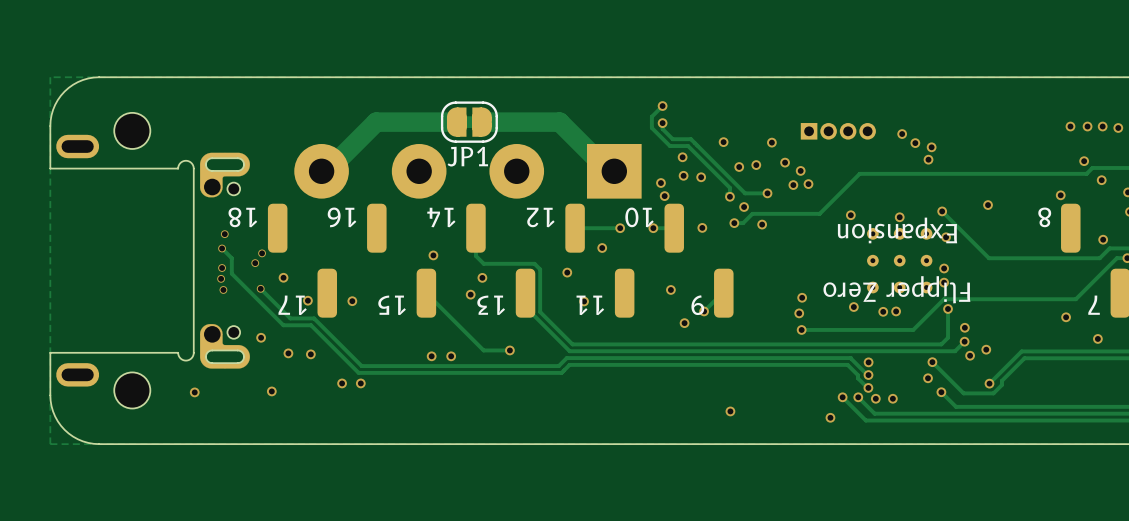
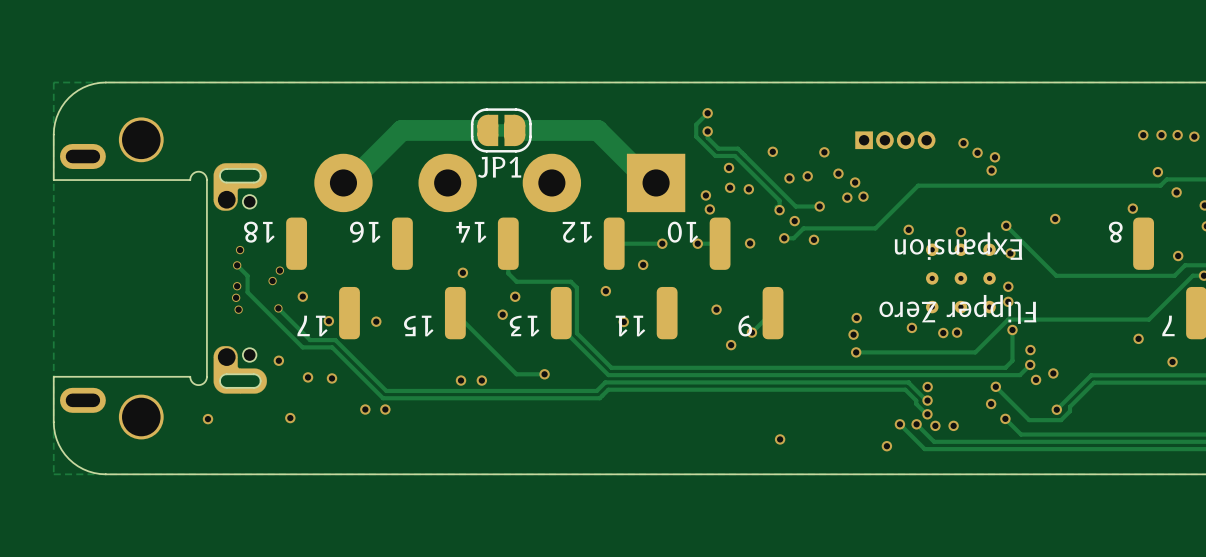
part footprint: [49, 112, 250, 409] -> [53, 117, 267, 440]

